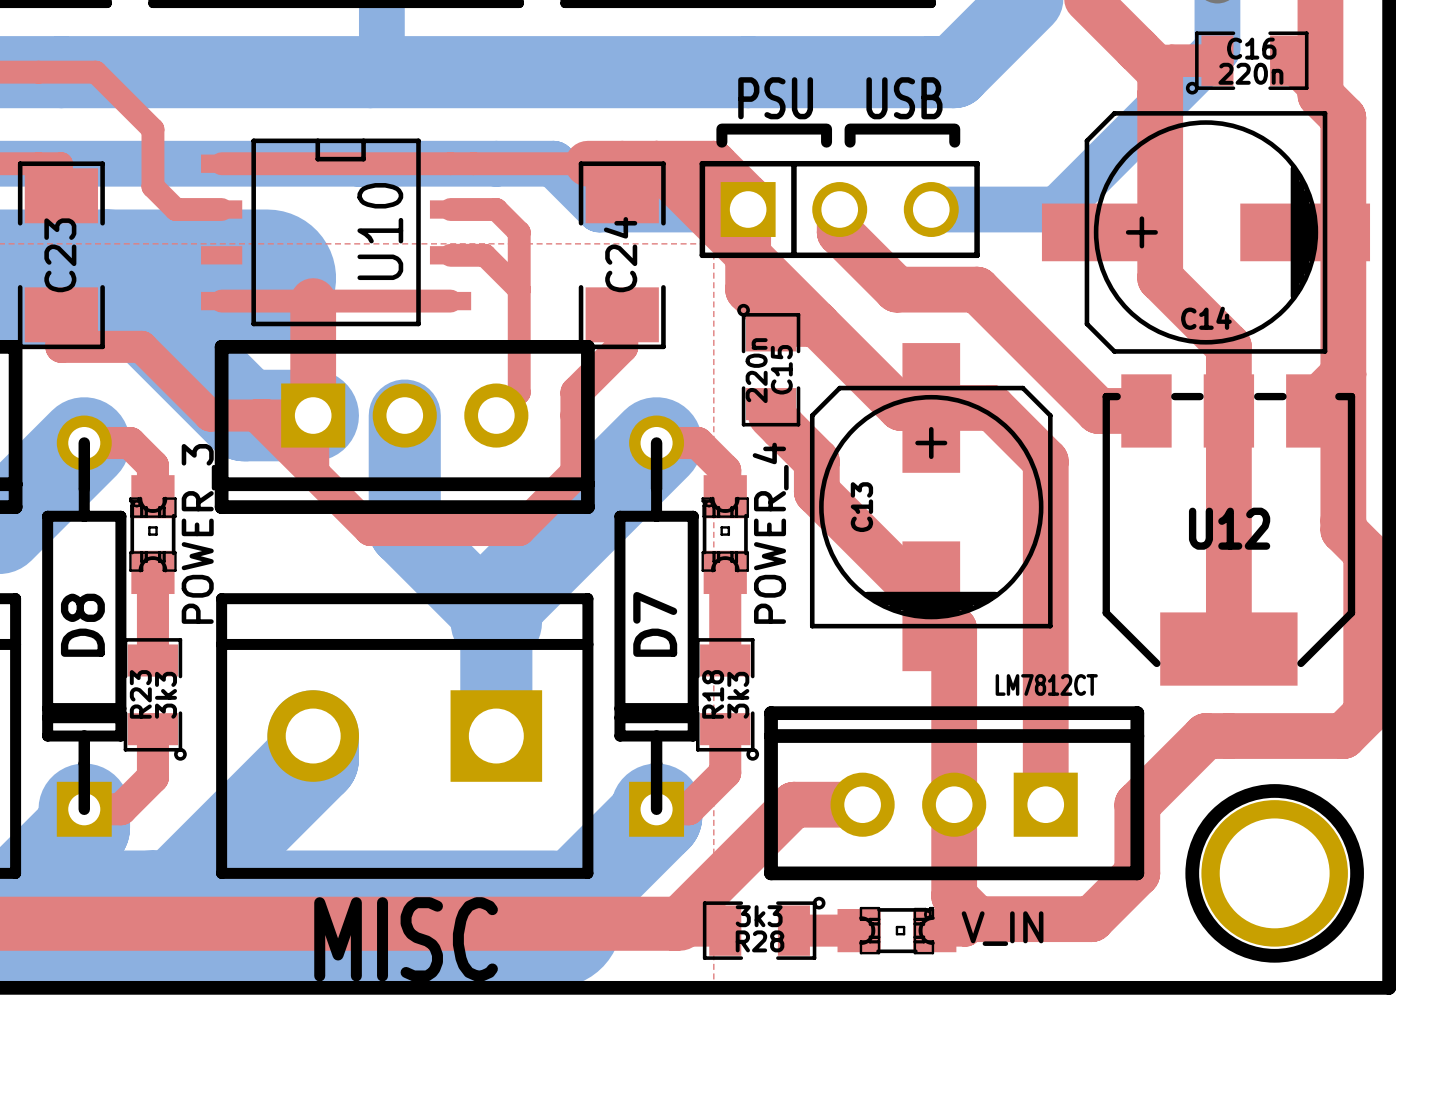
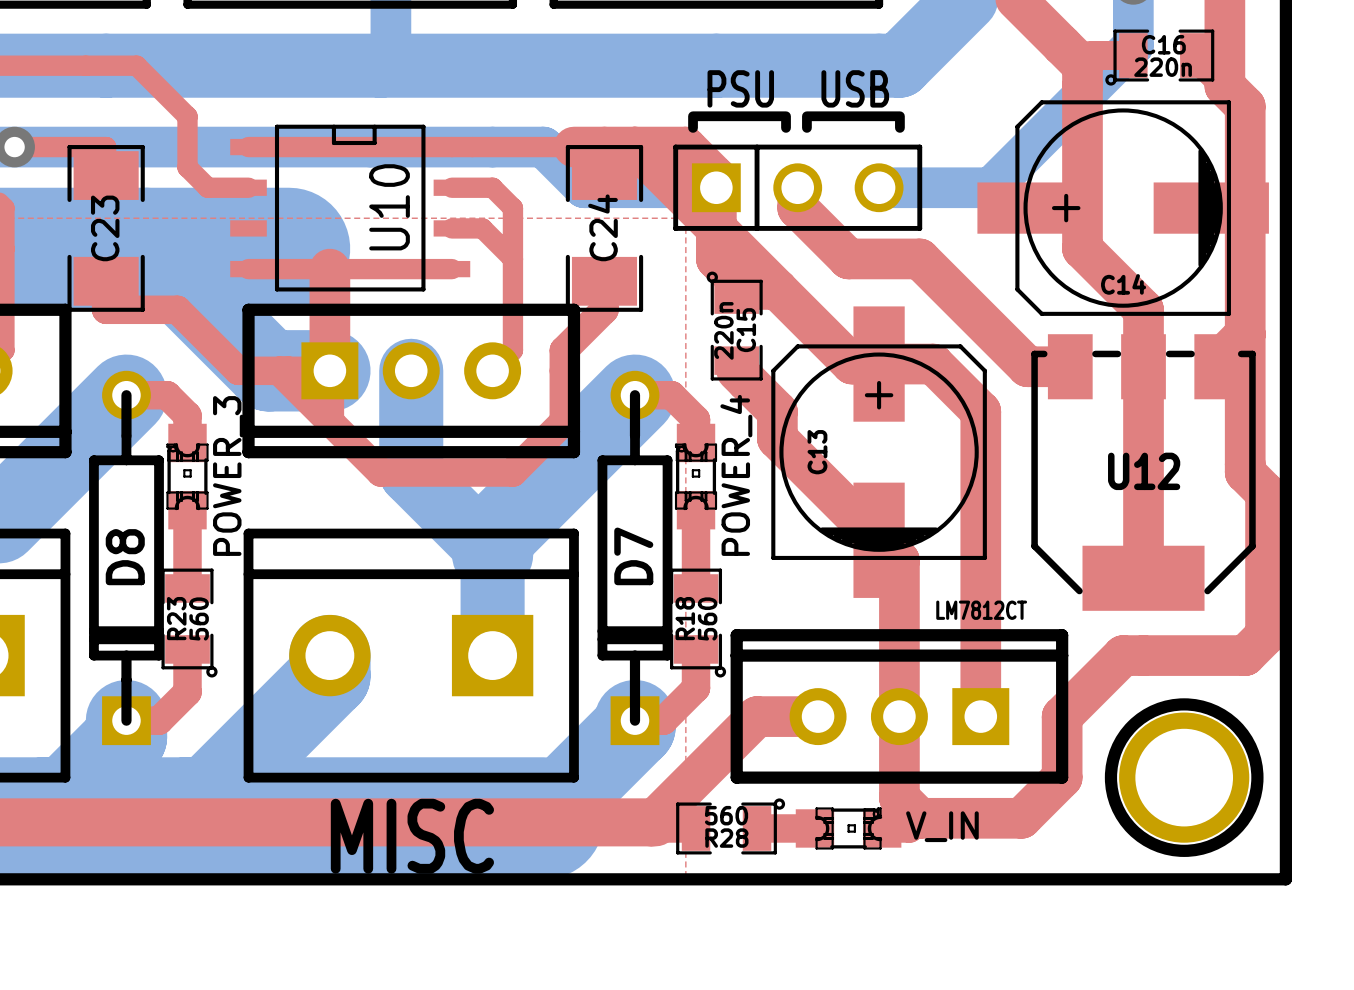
R23 value: 3k3 (166, 695) -> 560 (199, 618)
R18 value: 3k3 (738, 695) -> 560 (707, 618)
R28 value: 3k3 (759, 916) -> 560 (726, 815)

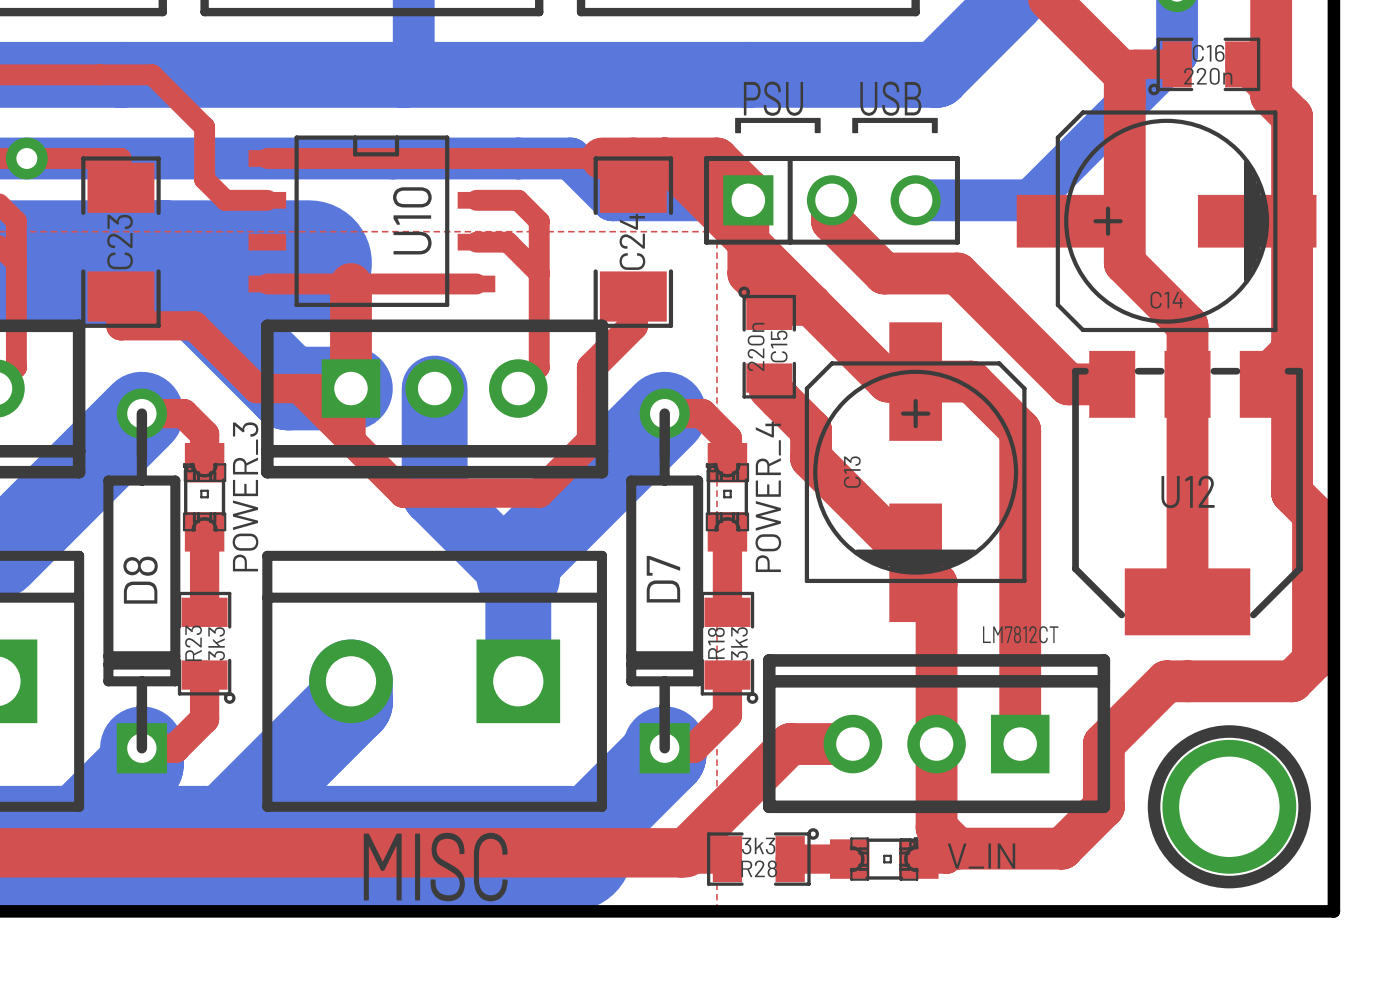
R23 value: 560 (199, 618) -> 3k3 (216, 643)
R18 value: 560 (707, 618) -> 3k3 (739, 643)
R28 value: 560 (726, 815) -> 3k3 (758, 846)

